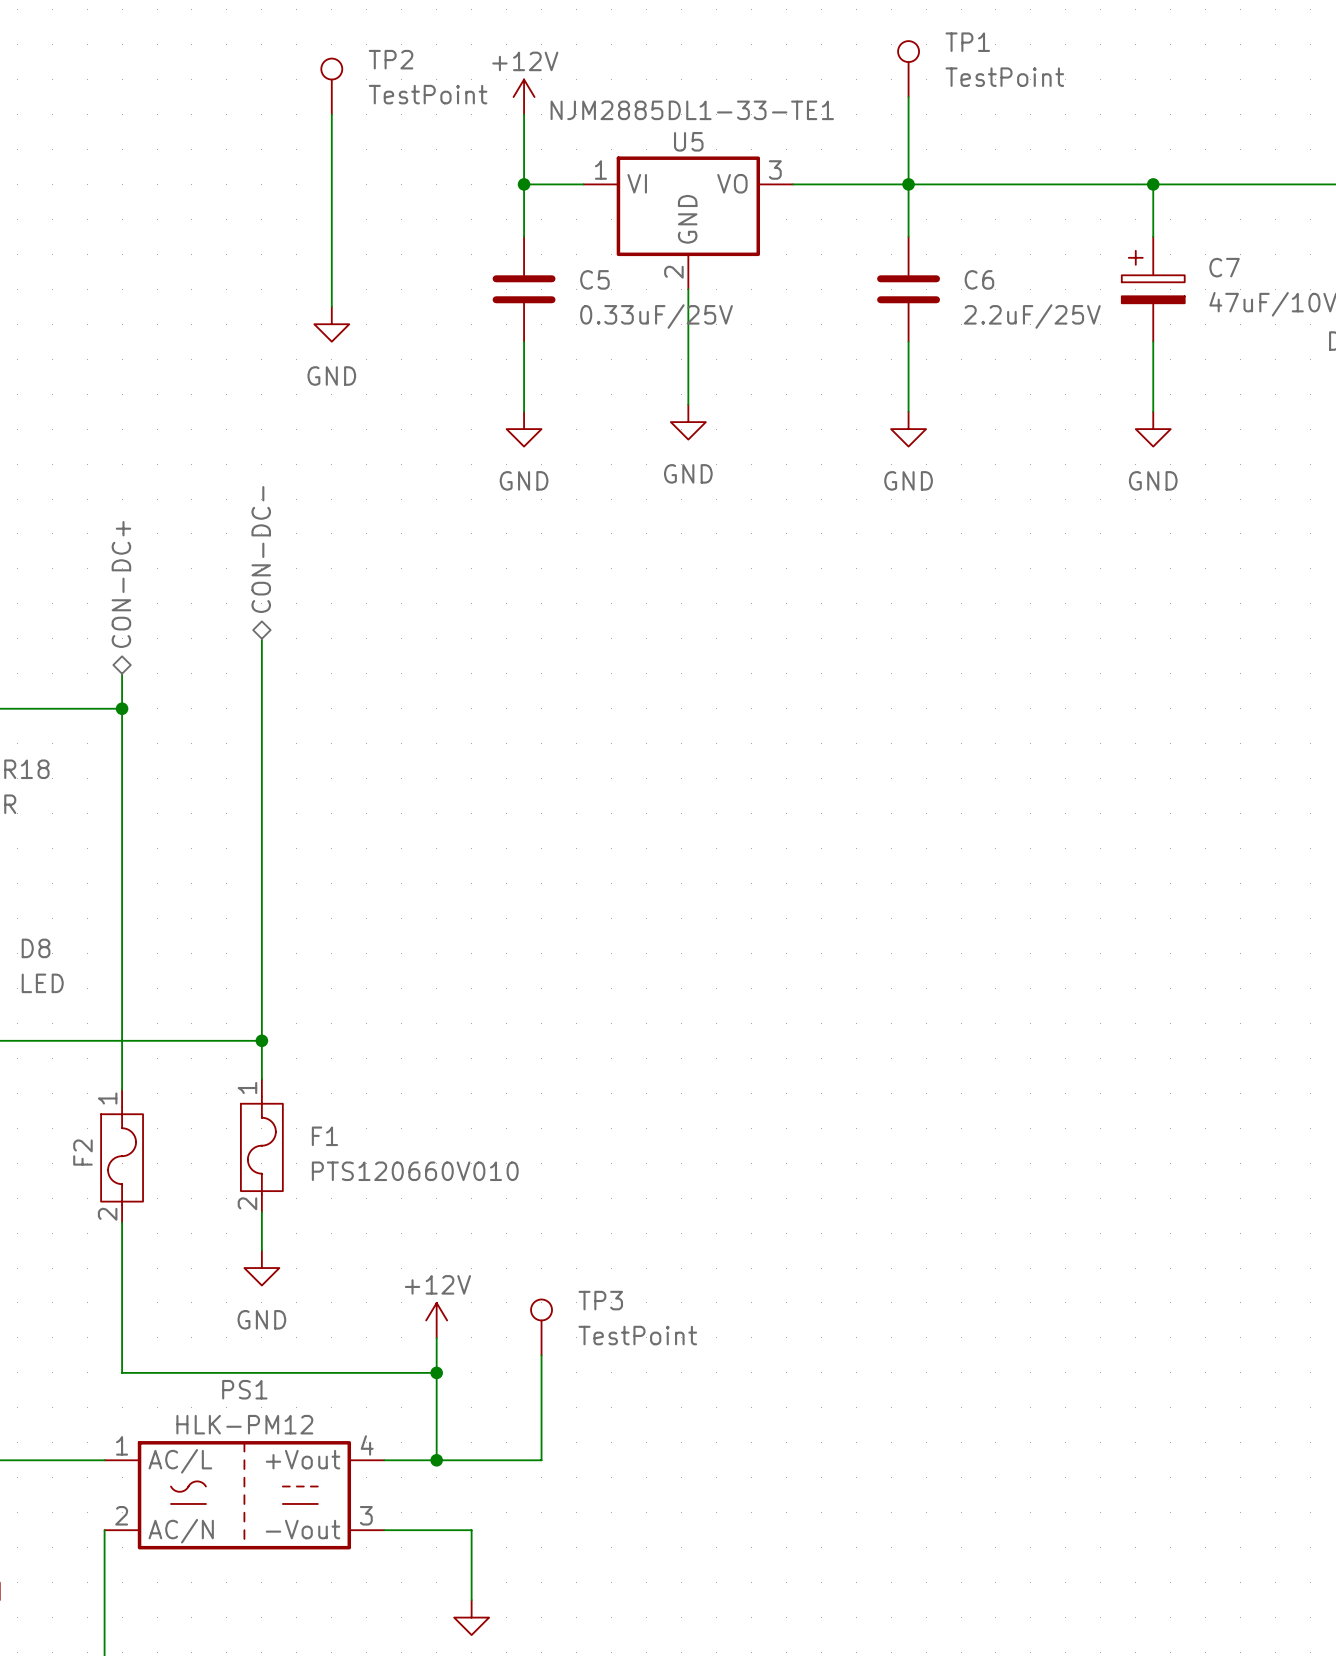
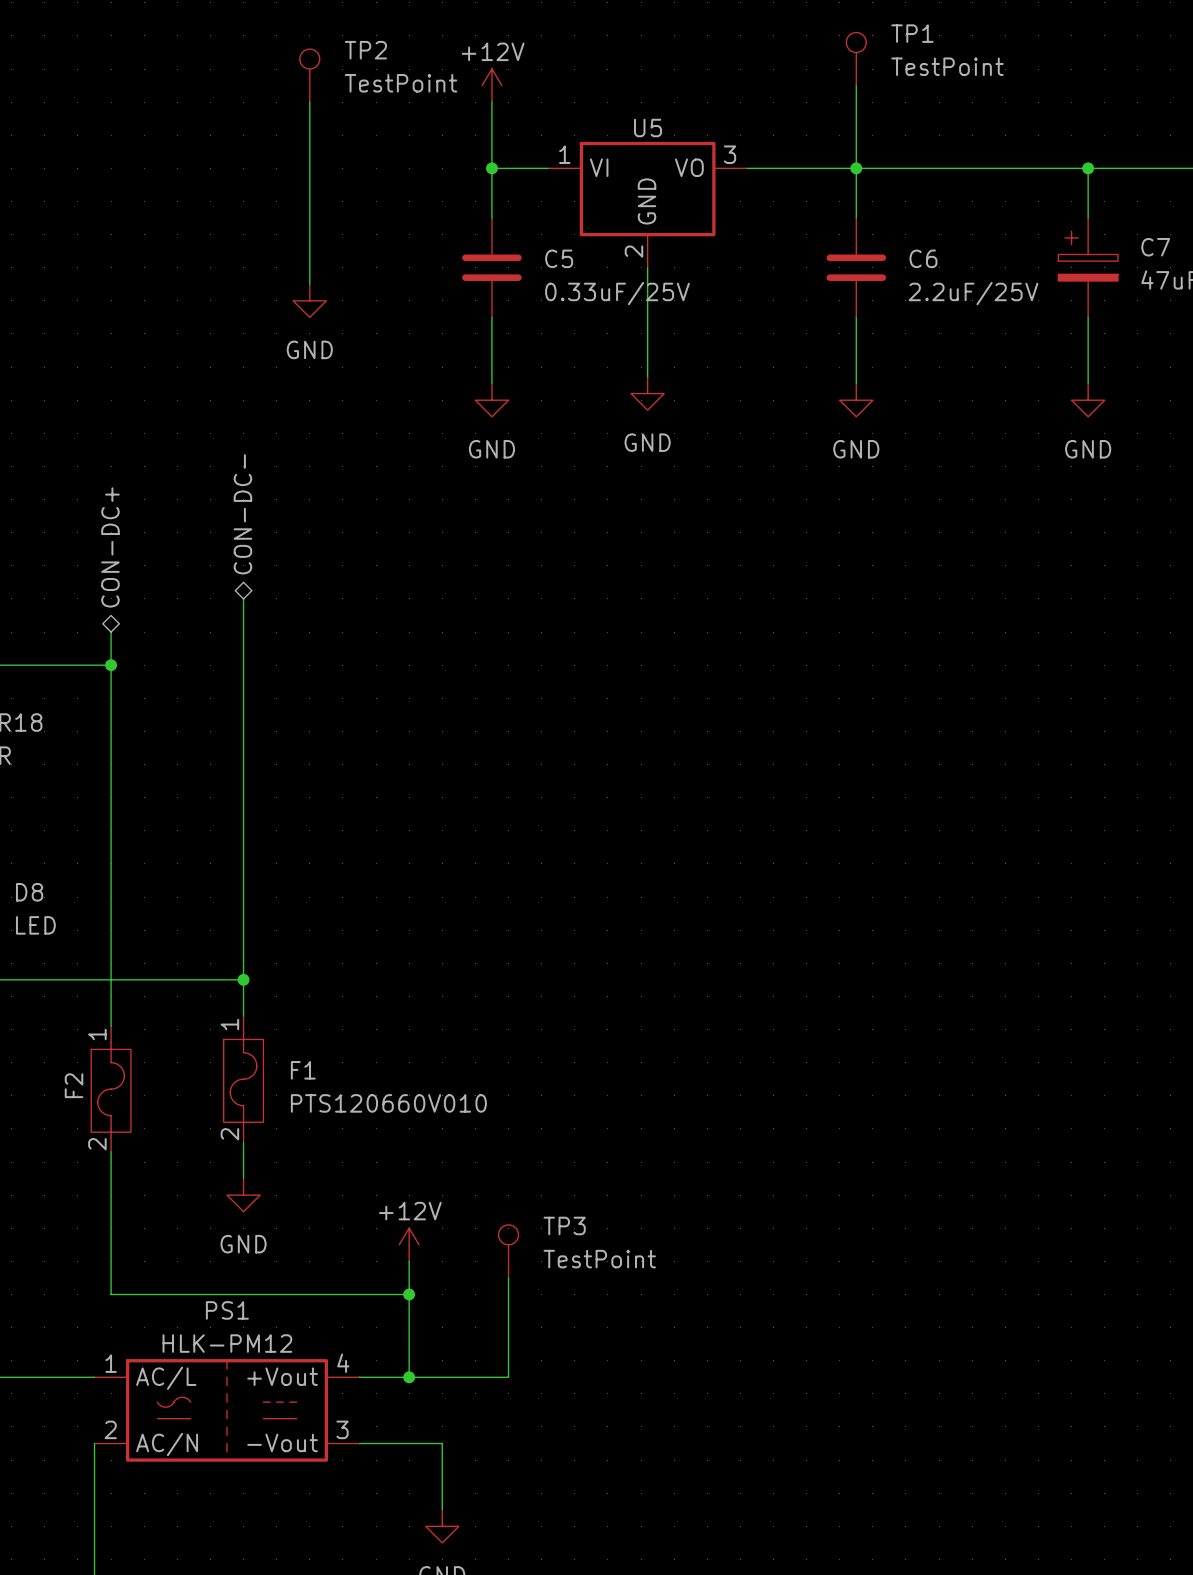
U5 value: NJM2885DL1-33-TE1 (692, 110) -> none

